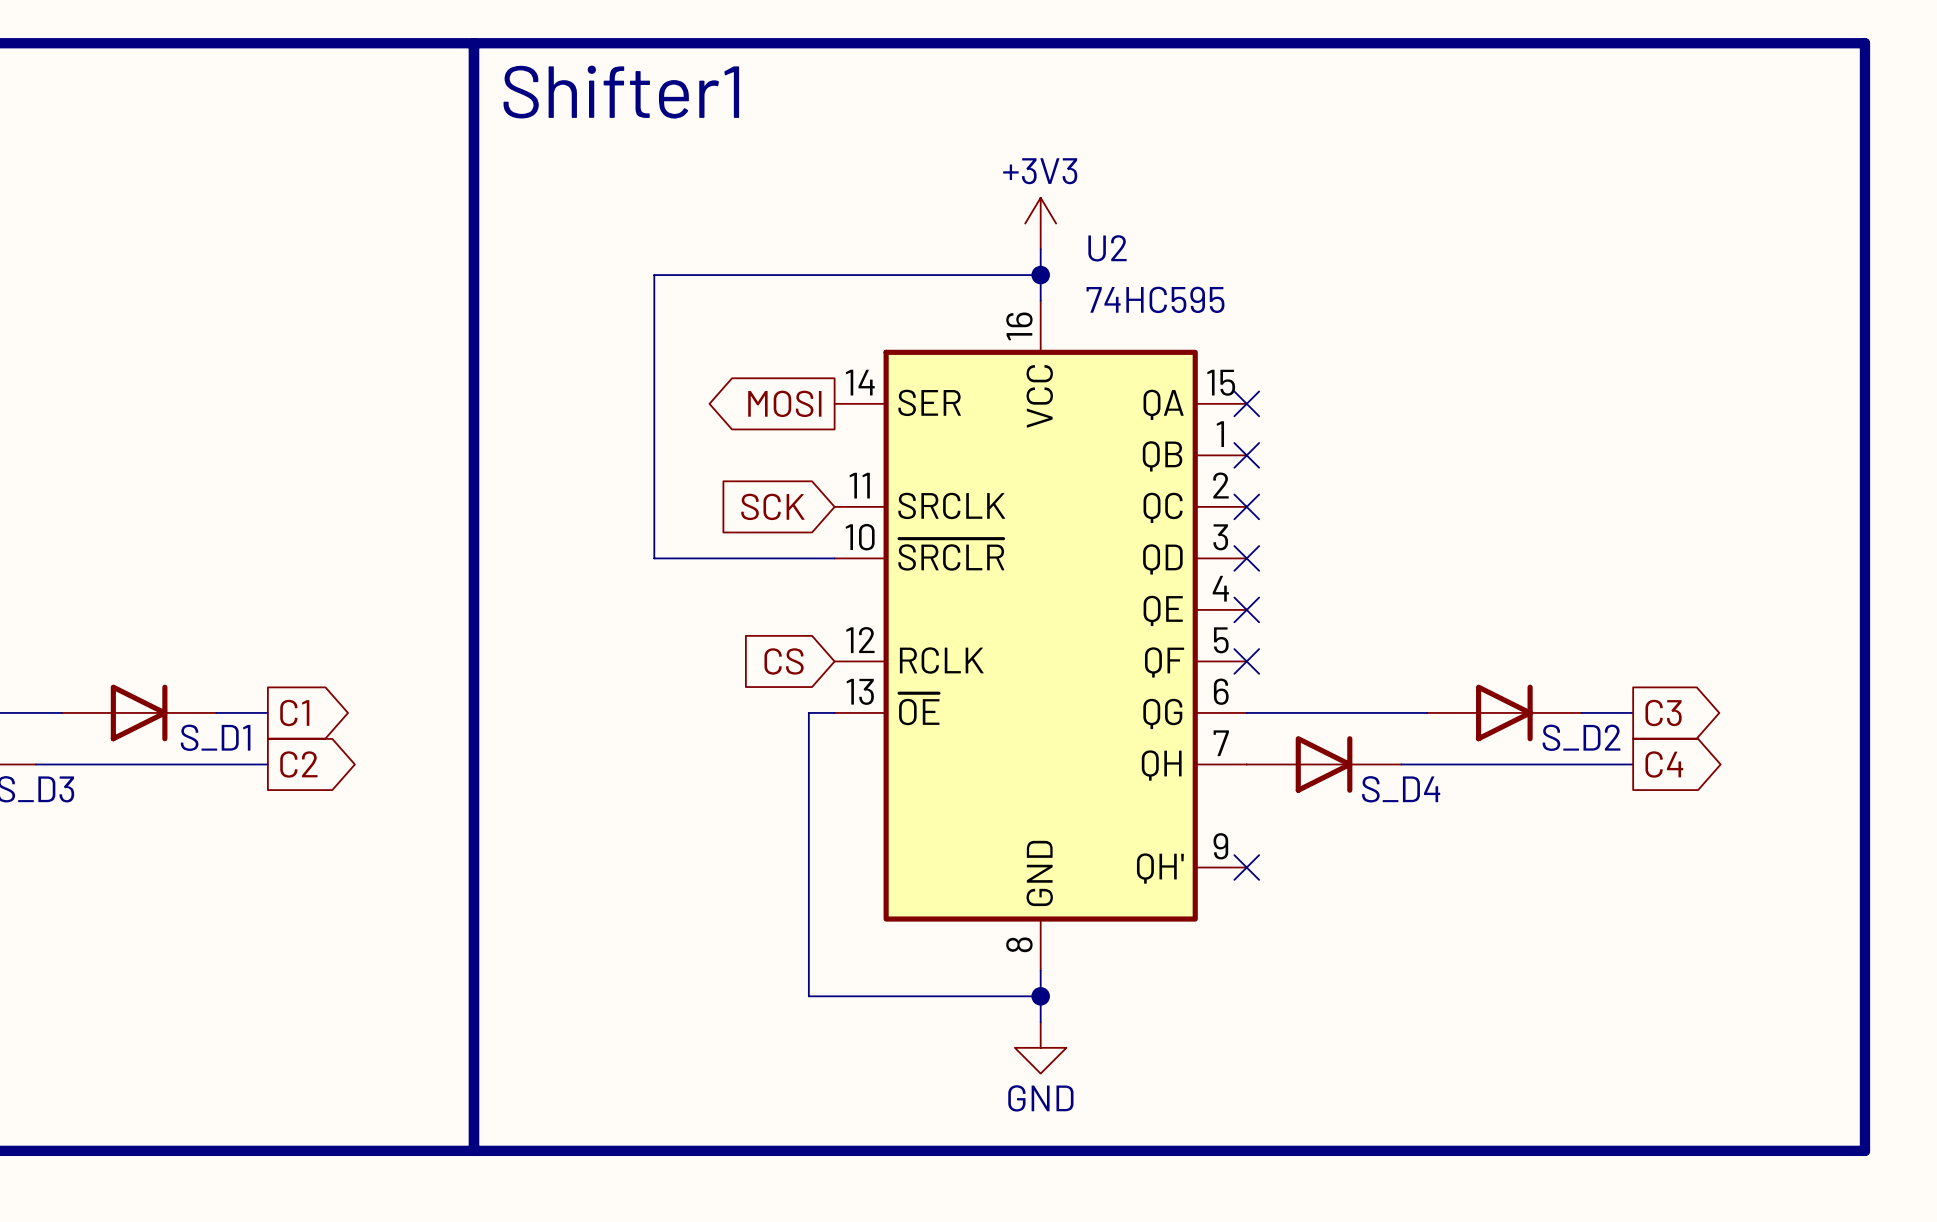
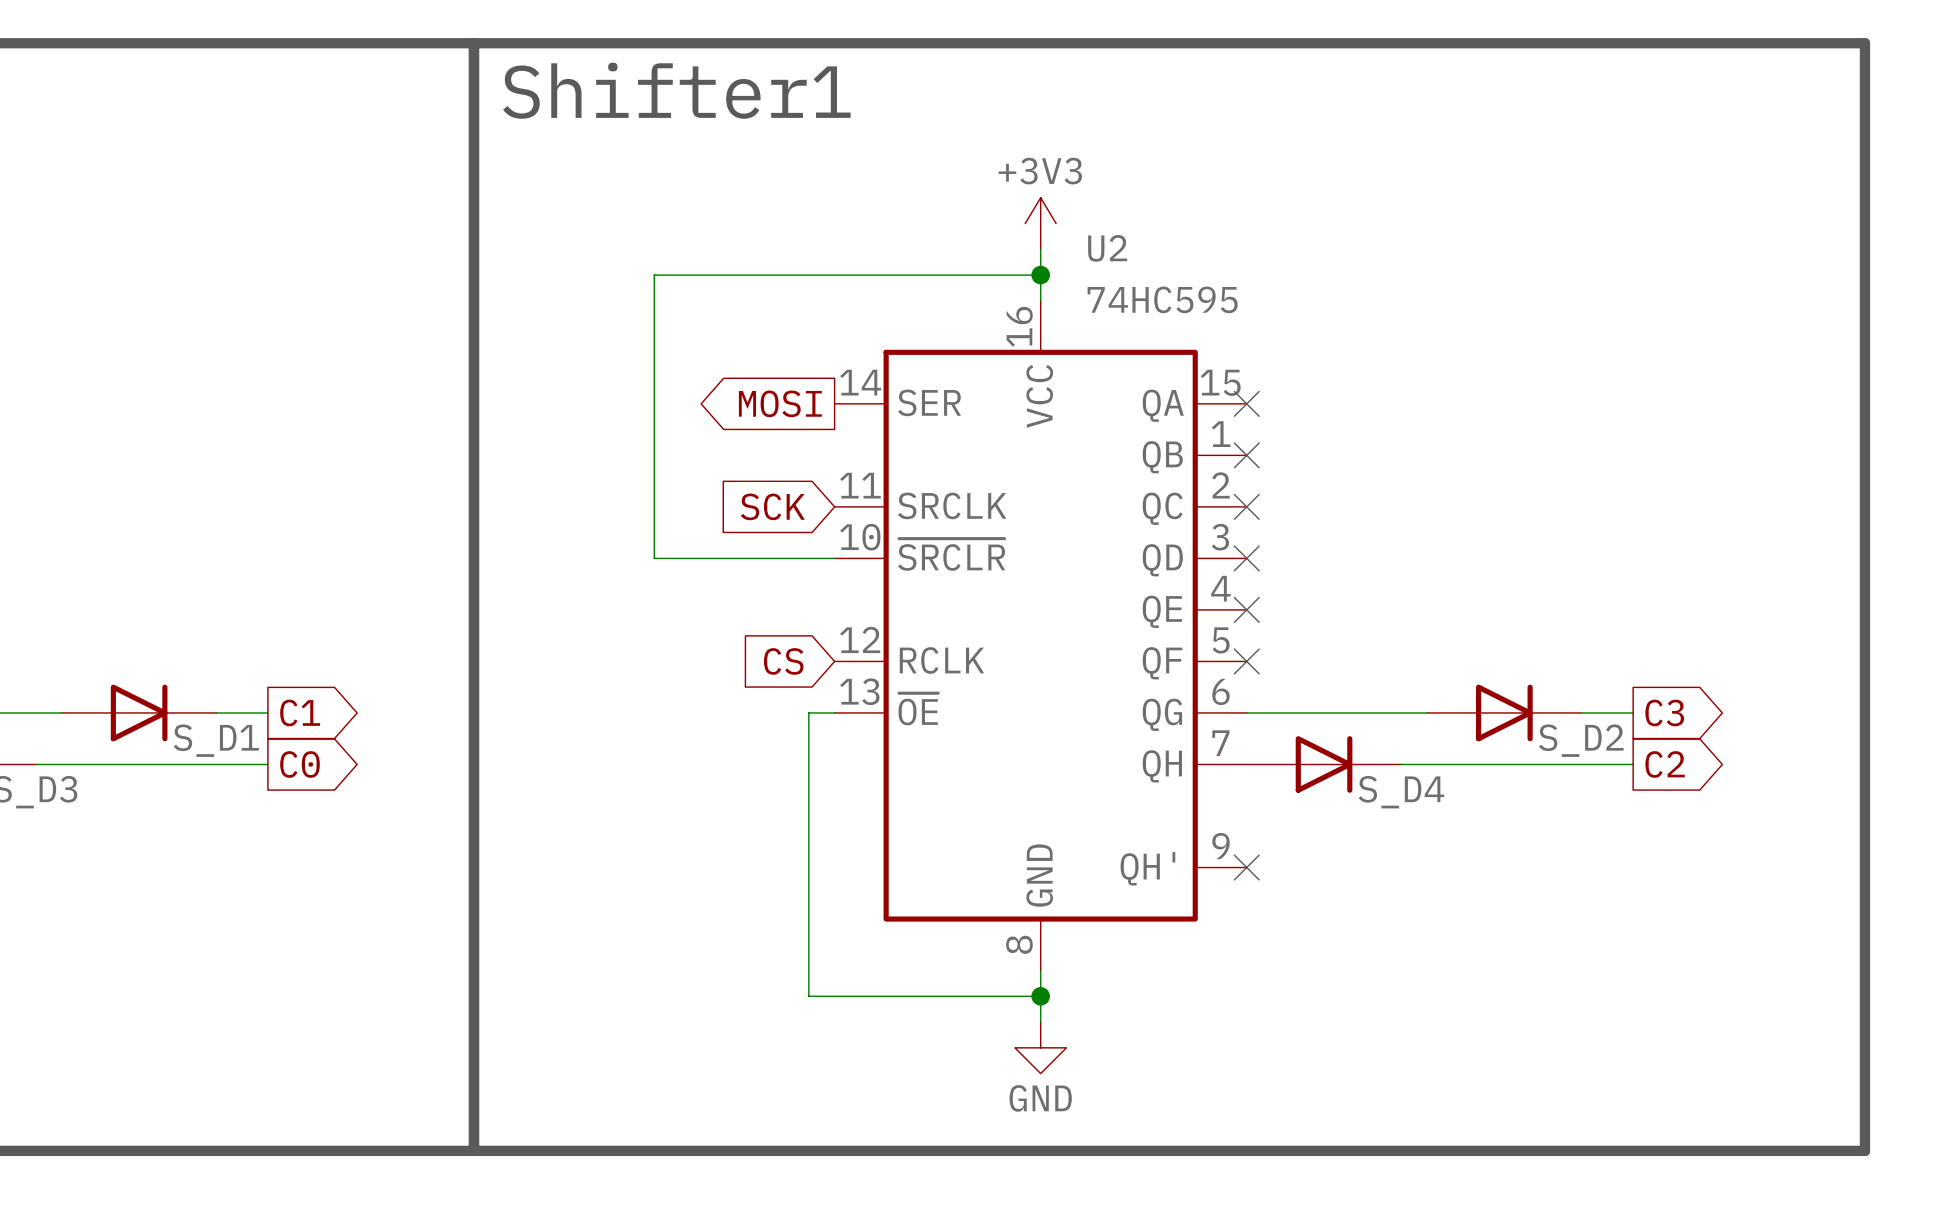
global label: C2 (298, 764) -> C0 (299, 764)
global label: C4 (1664, 764) -> C2 (1665, 764)

